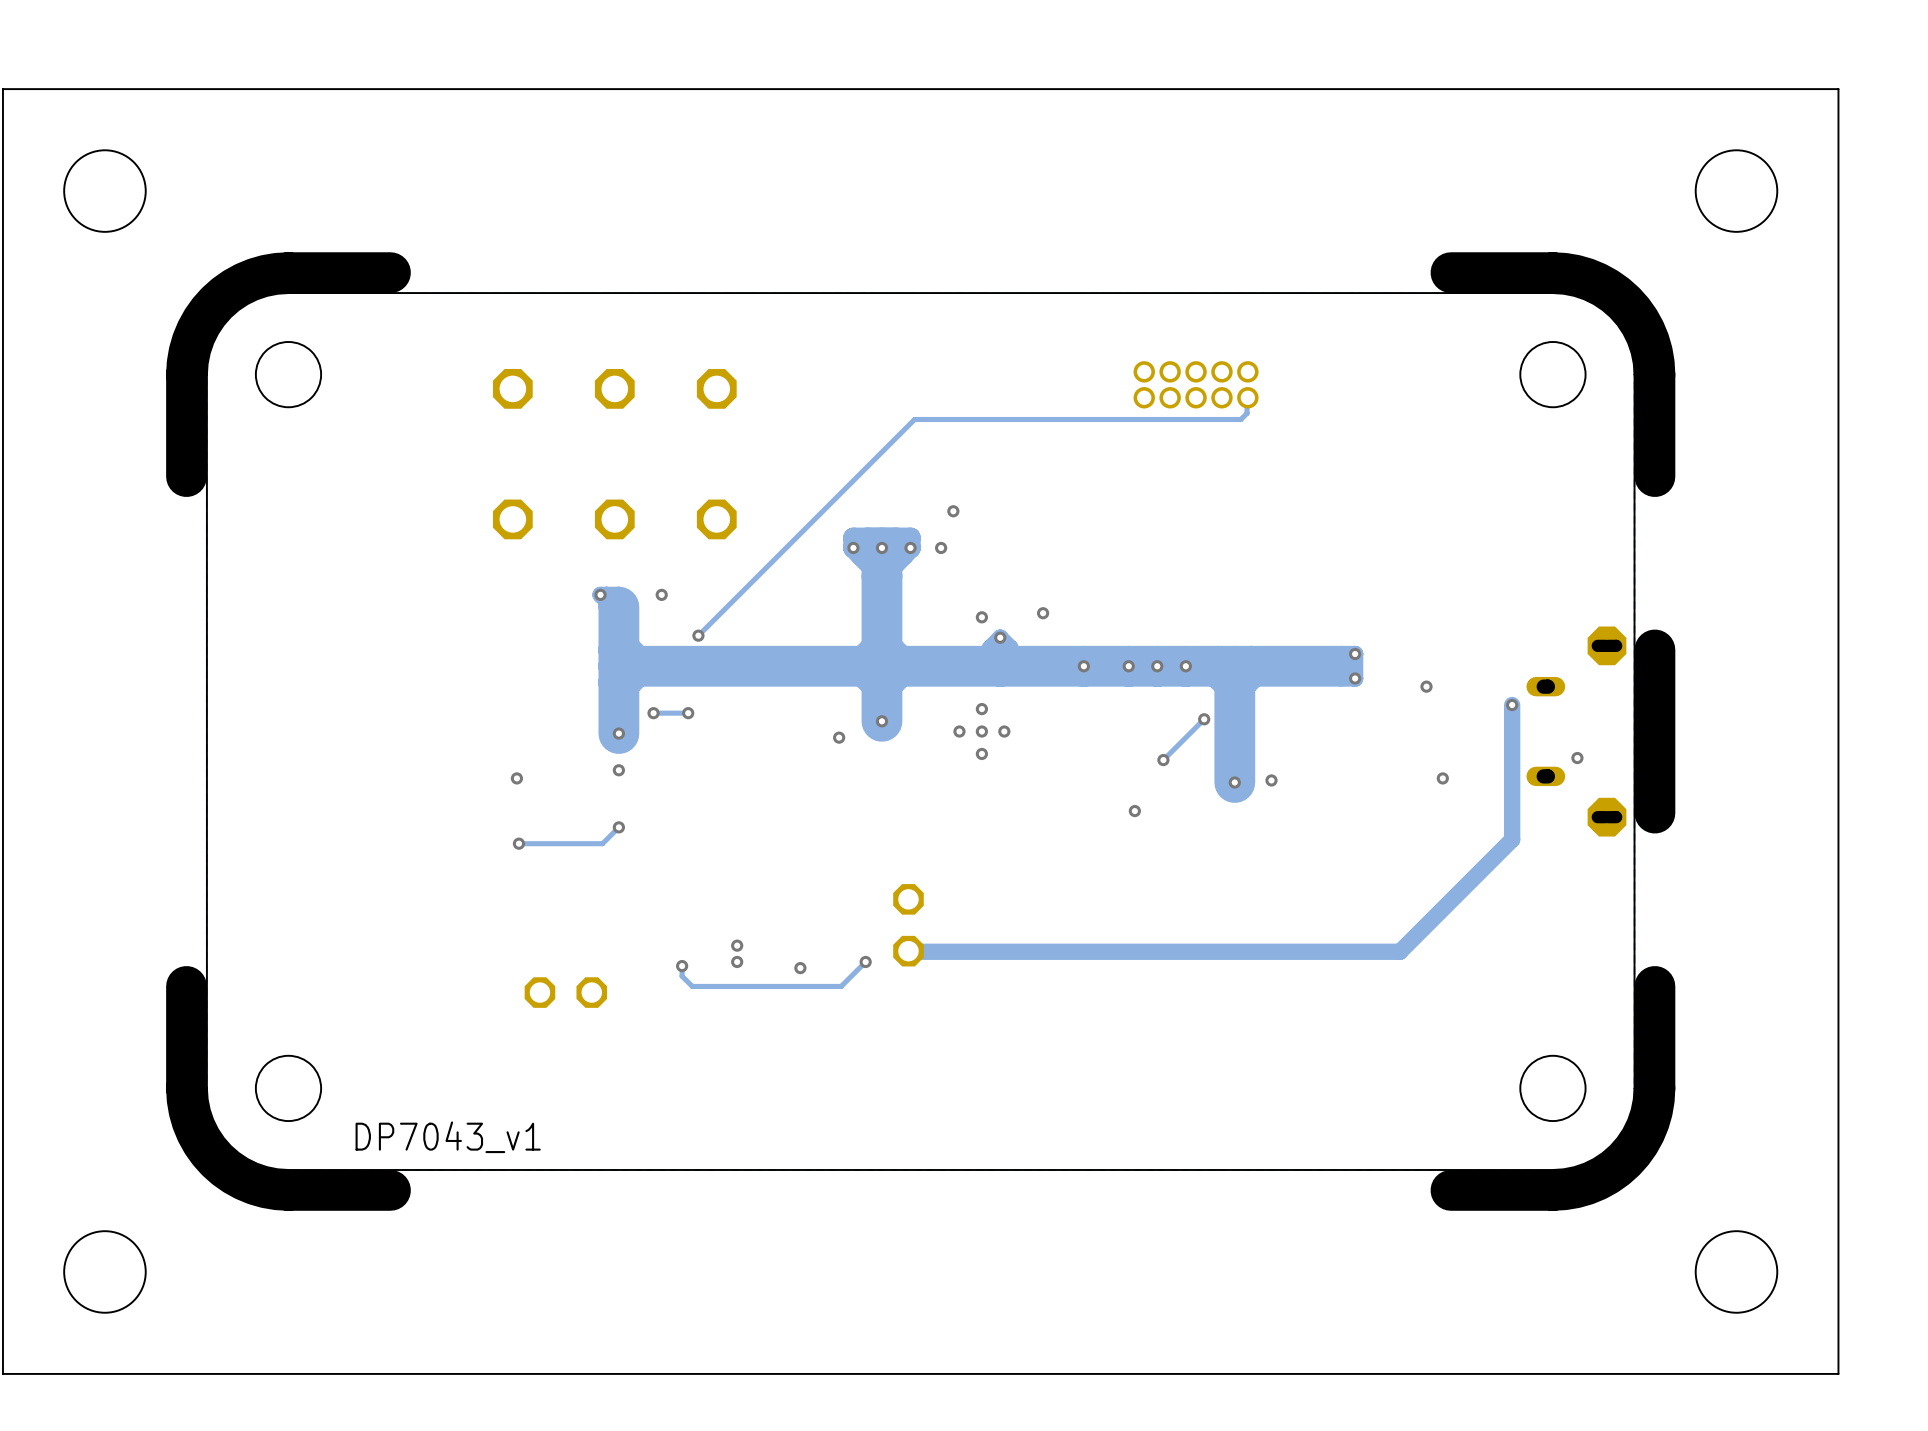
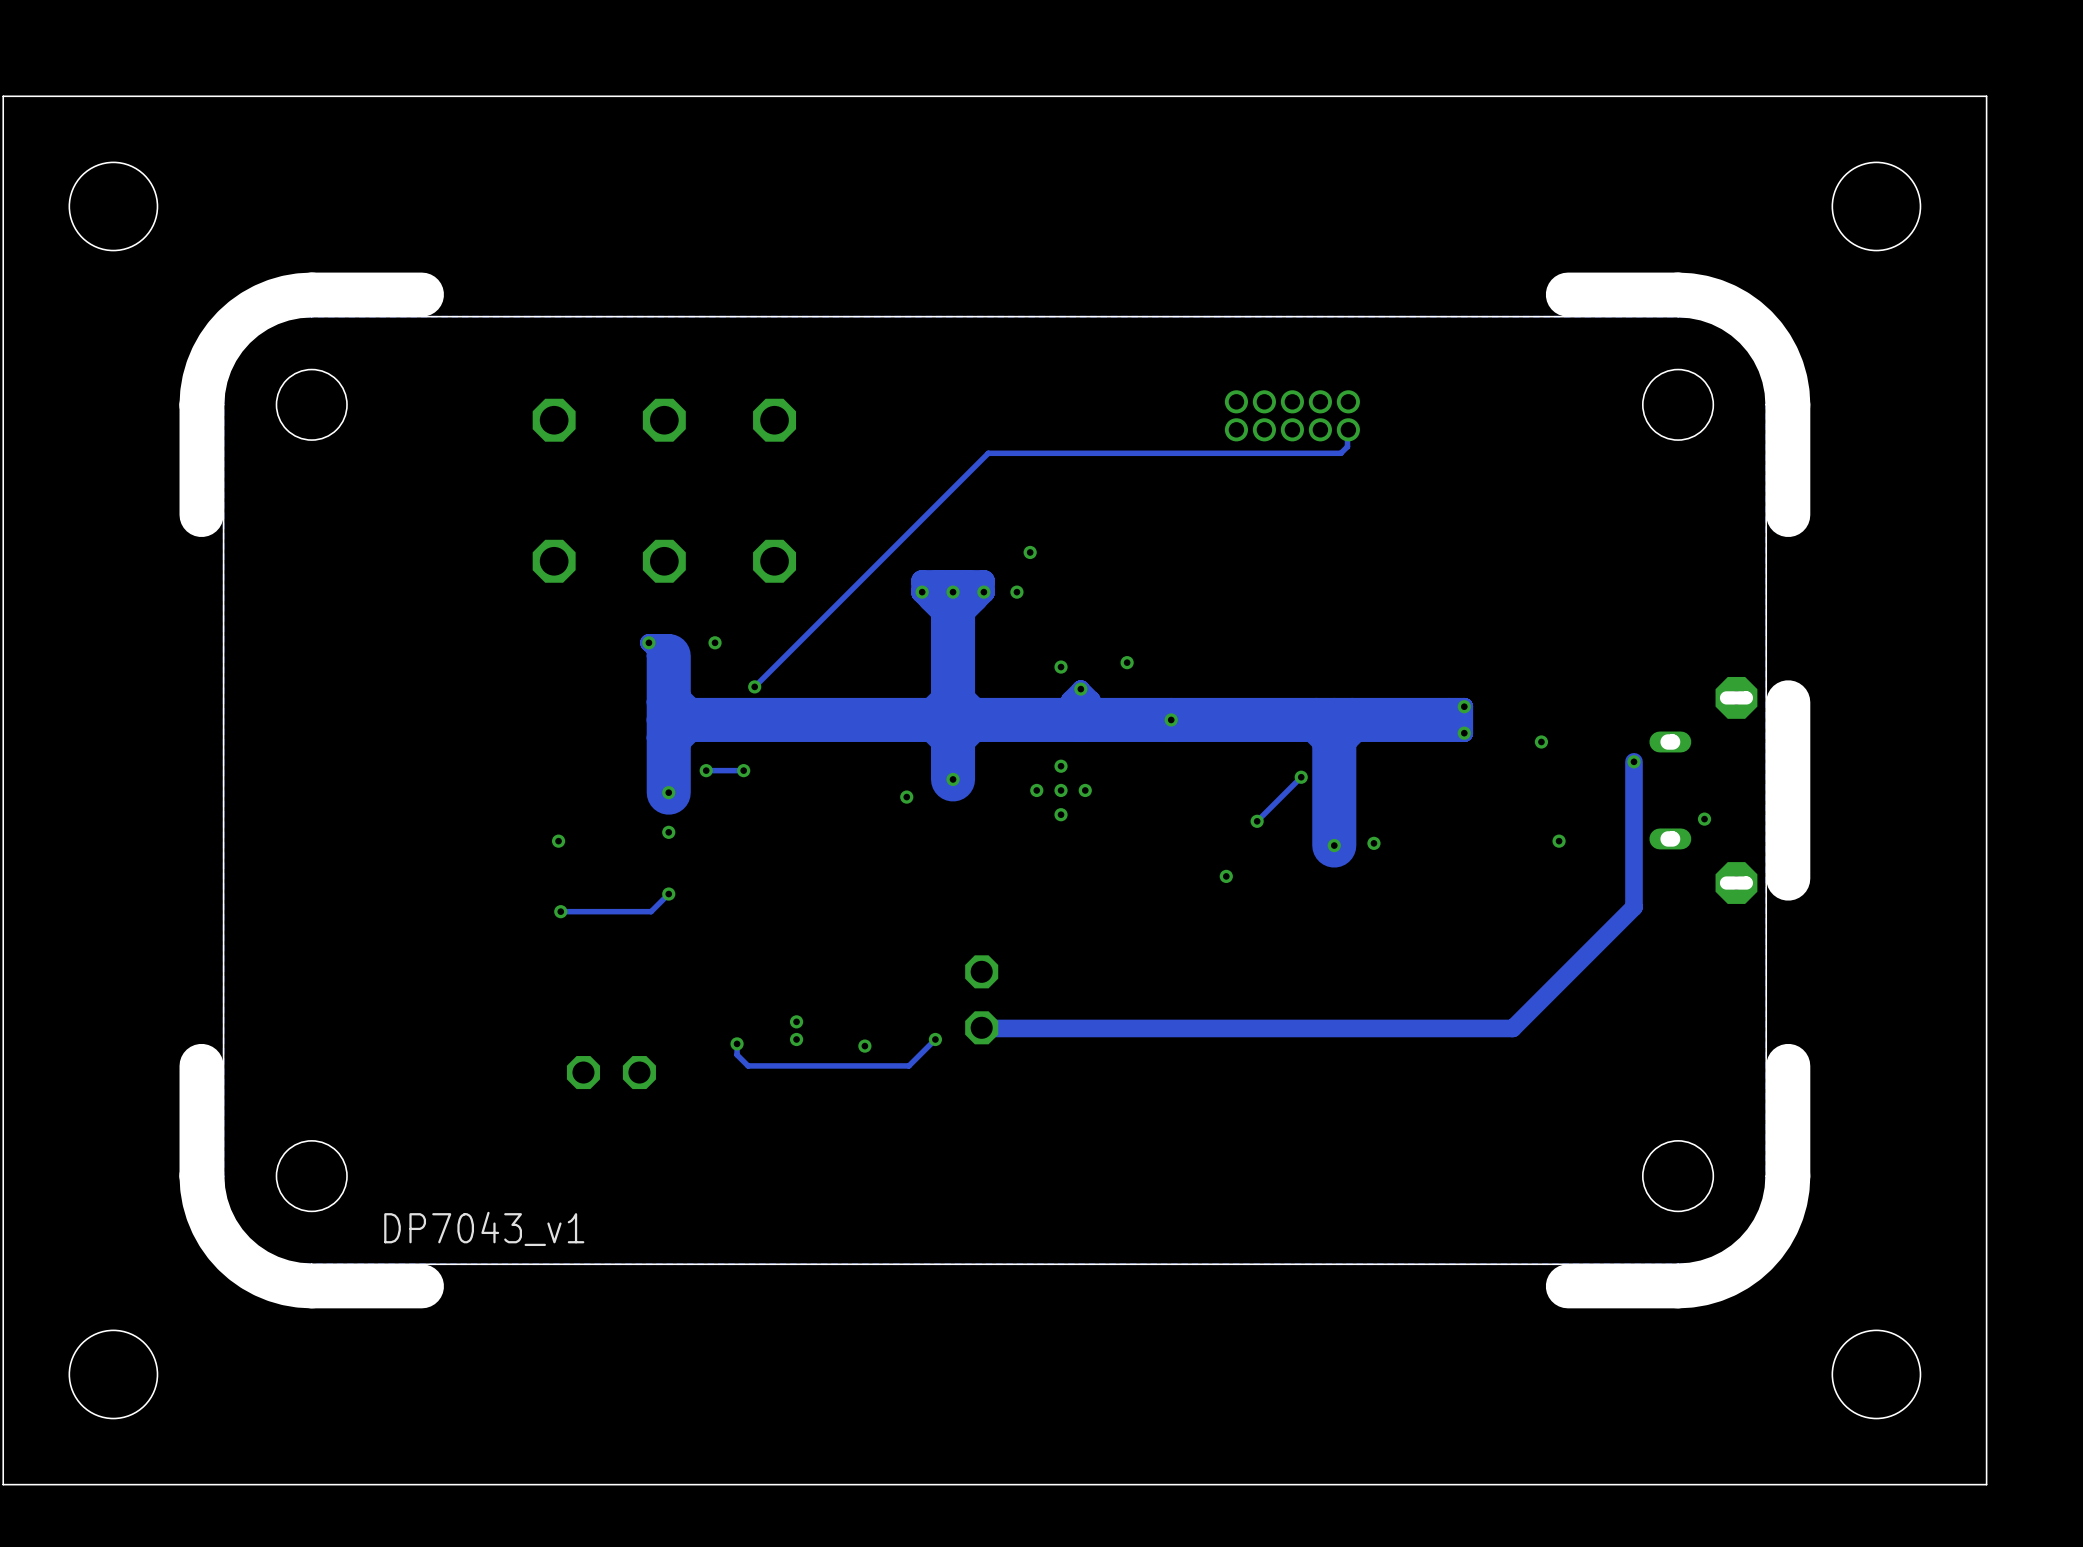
via: (1128, 666) -> none
via: (1157, 666) -> none
via: (1185, 666) -> none

